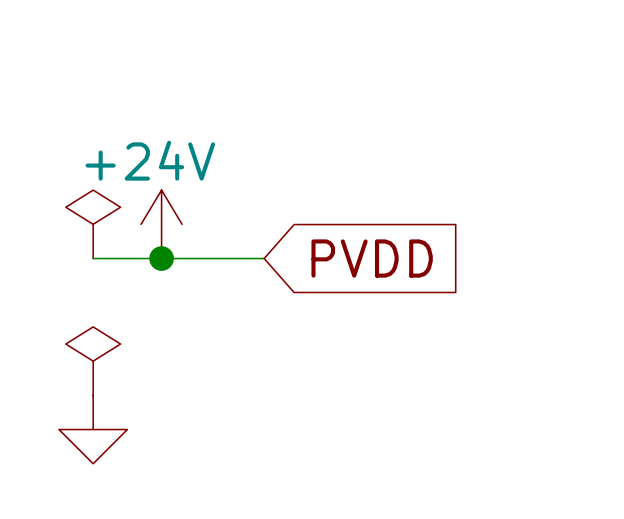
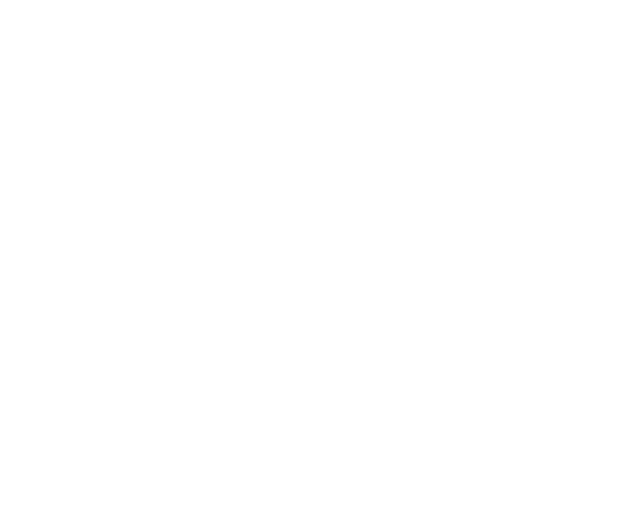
power symbol: (93, 224) -> none
power symbol: +24V (161, 224) -> none
wire: (93, 258) (264, 258) -> none
junction: (161, 258) -> none
global label: PVDD (372, 258) -> none
power symbol: (93, 361) -> none
power symbol: (93, 429) -> none

